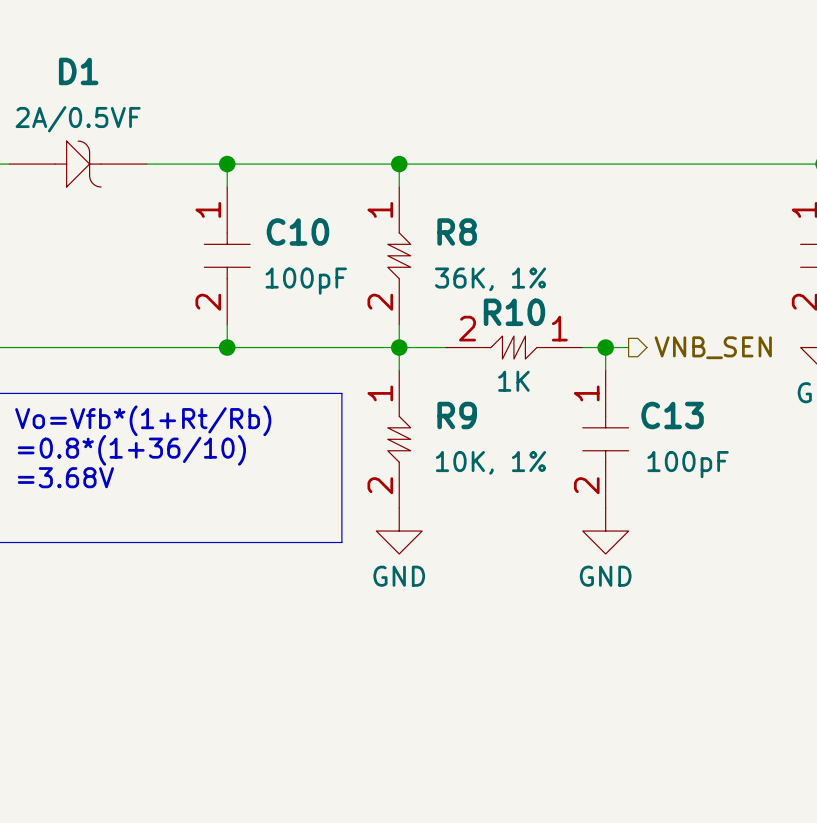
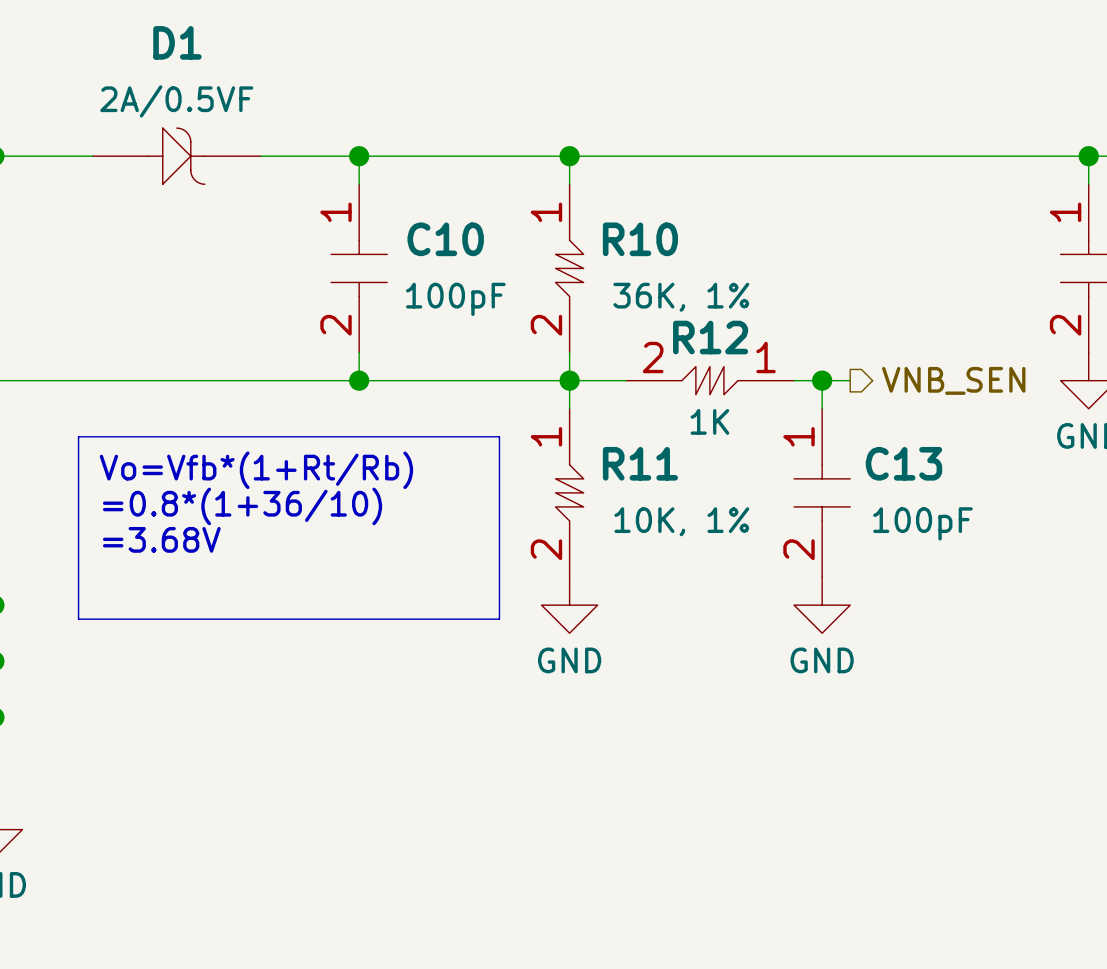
R8 name: R8 (457, 232) -> R10 (640, 239)
R10 name: R10 (514, 312) -> R12 (710, 337)
R9 name: R9 (457, 415) -> R11 (640, 463)

